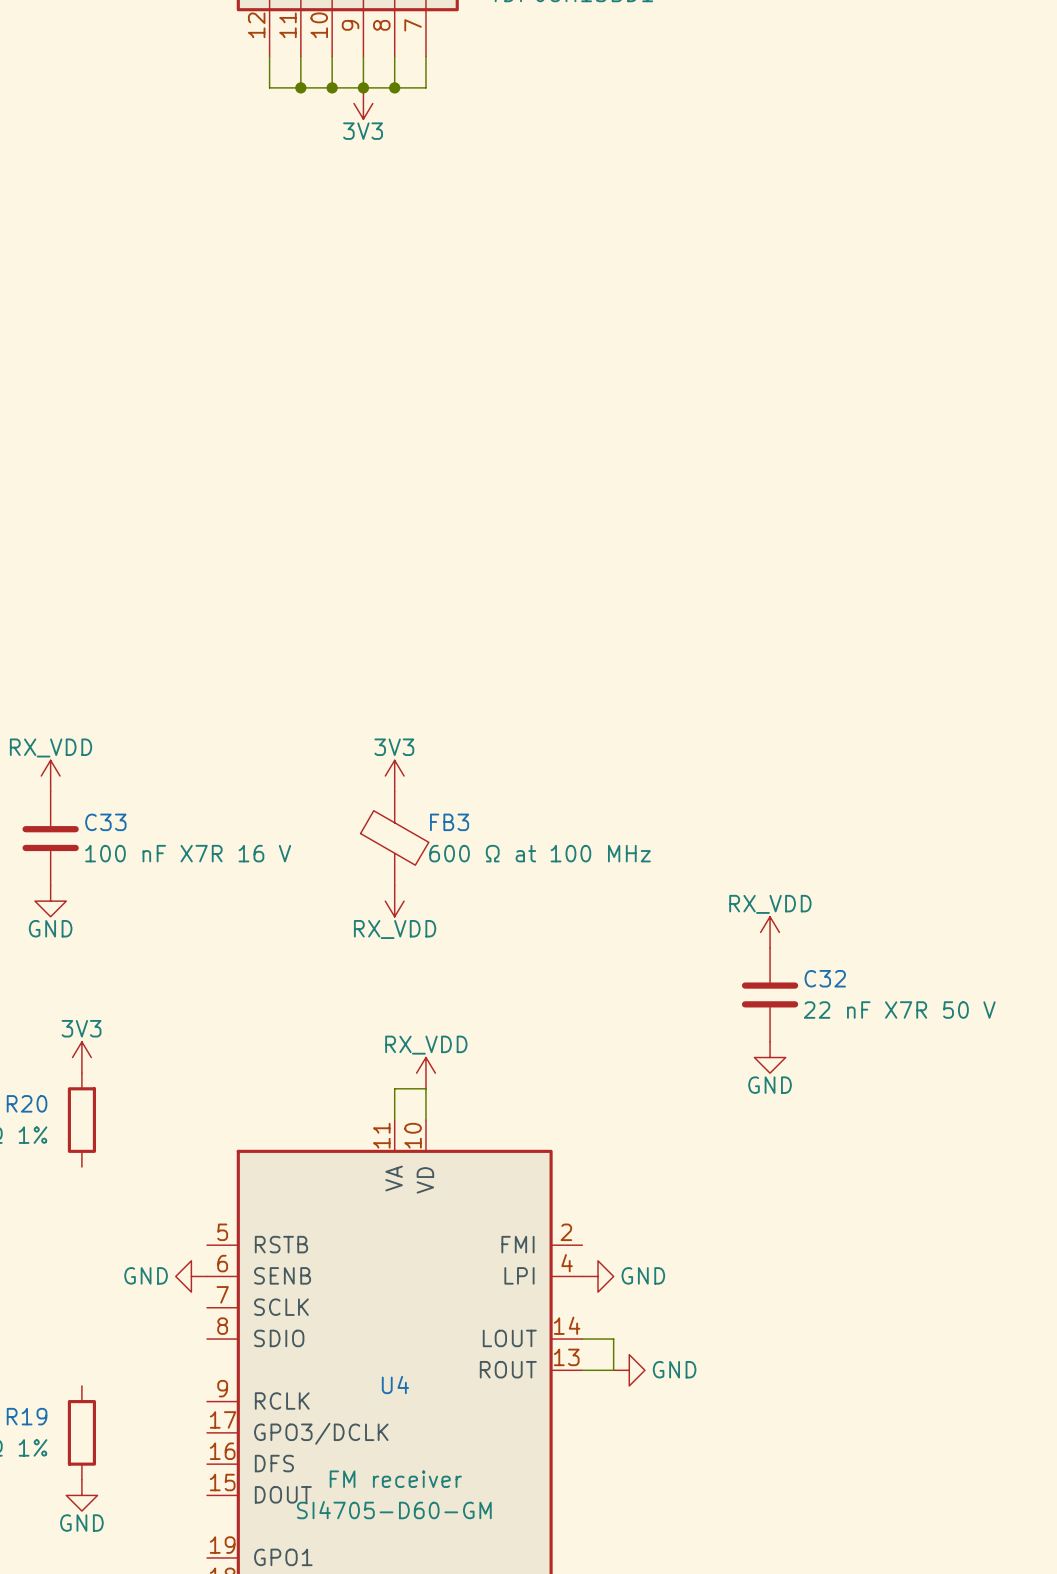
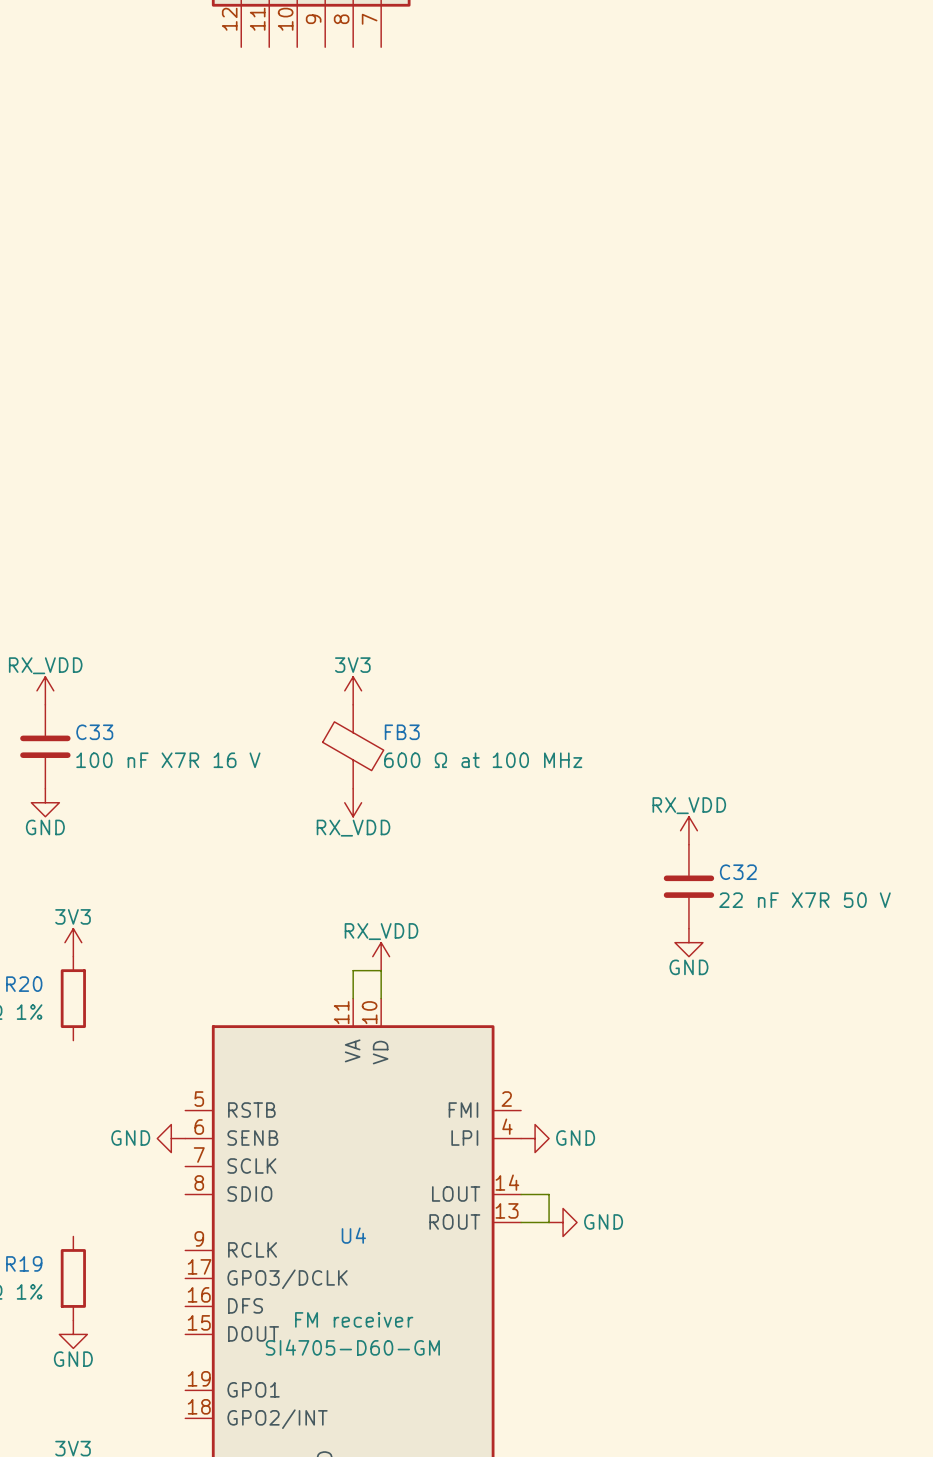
wire: (269, 56) (269, 87) (425, 87) (425, 56) -> none
wire: (300, 56) (300, 87) -> none
wire: (332, 56) (332, 87) -> none
wire: (363, 56) (363, 87) -> none
wire: (394, 56) (394, 87) -> none
junction: (300, 87) -> none
junction: (332, 87) -> none
junction: (363, 87) -> none
junction: (394, 87) -> none
power symbol: 3V3 (363, 103) -> none

